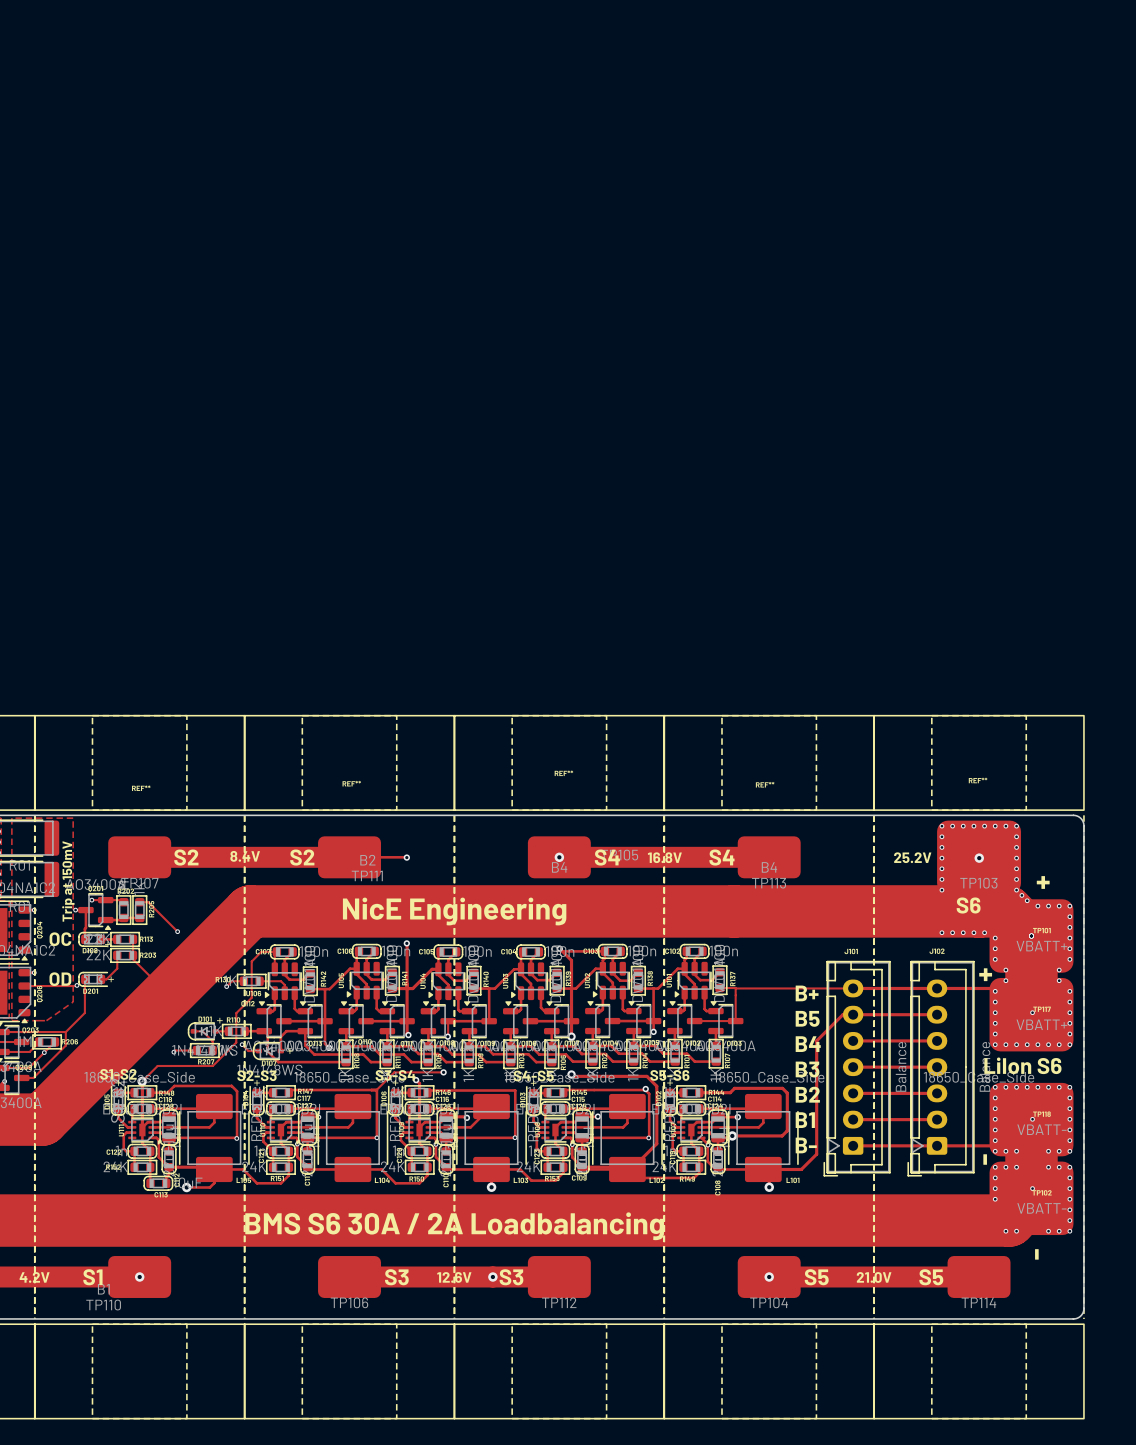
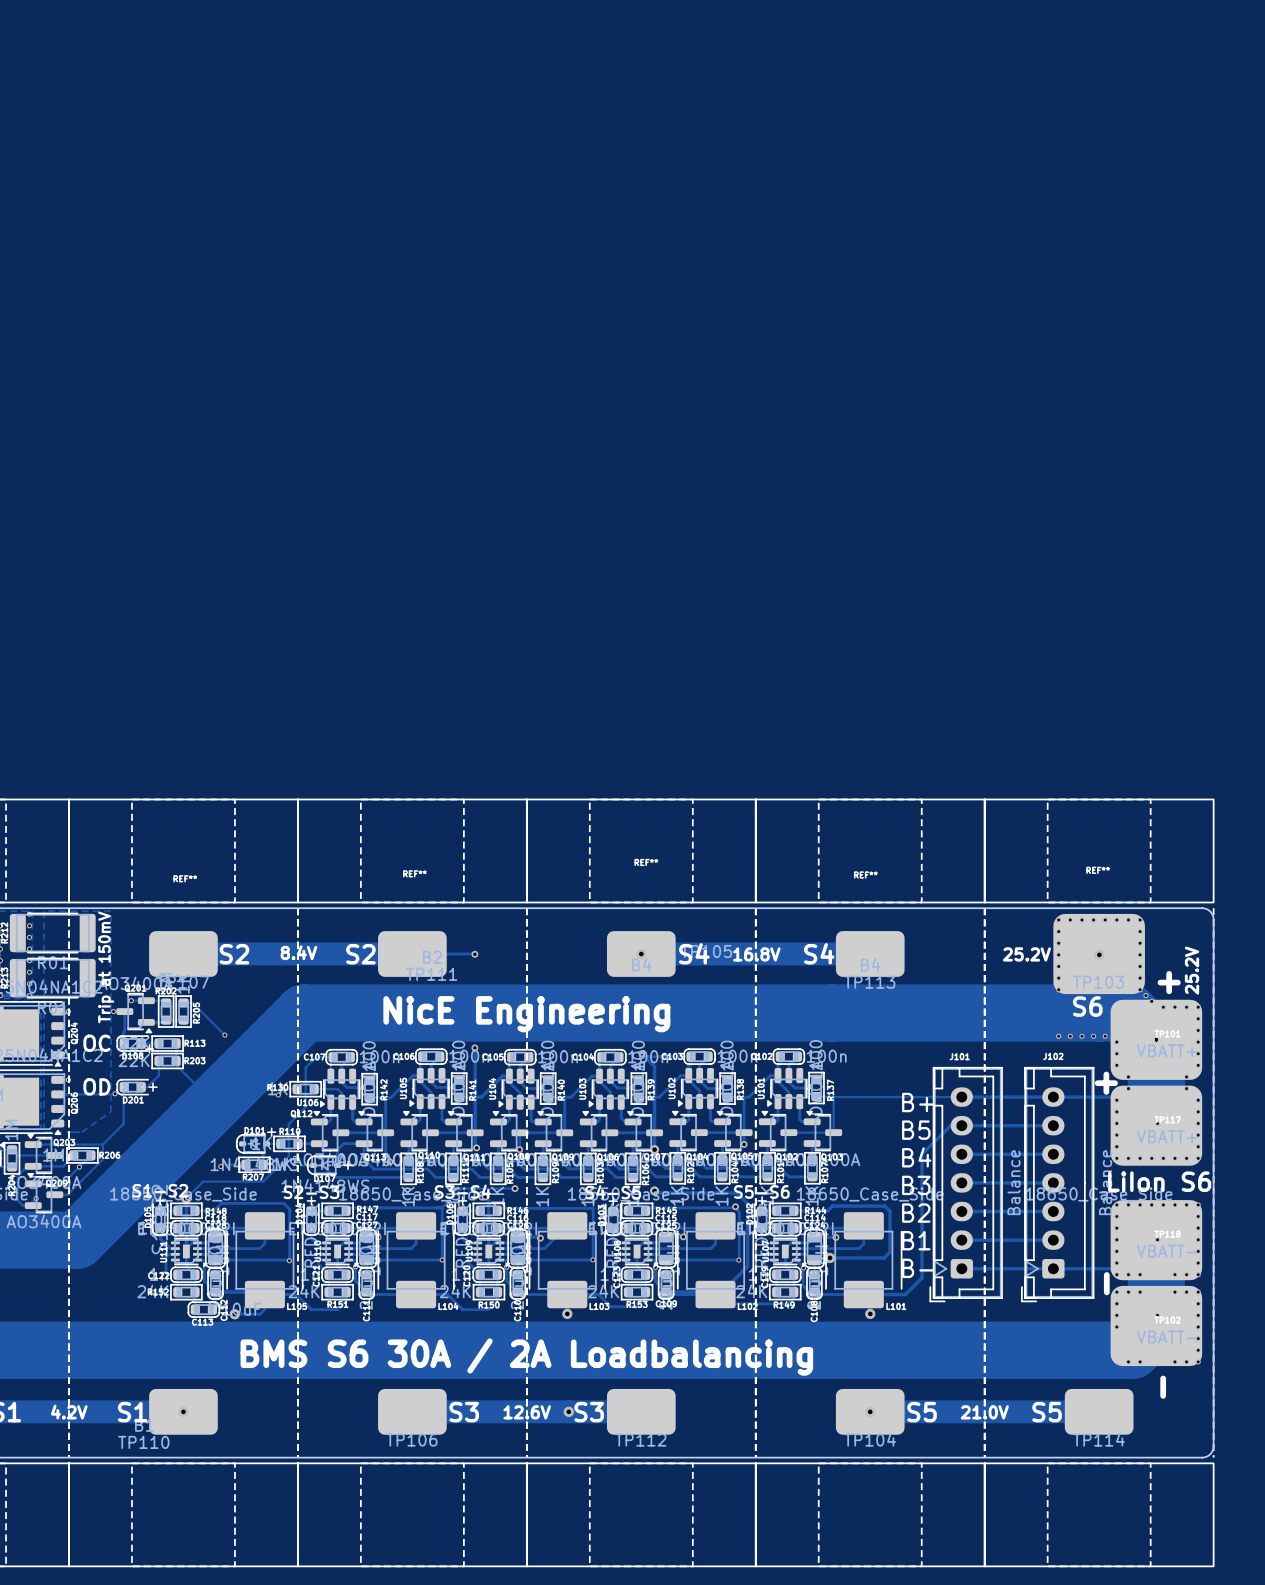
text: none -> 25.2V (1192, 970)

